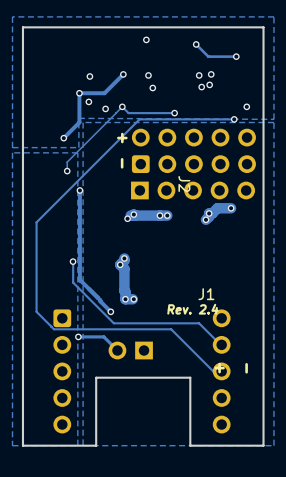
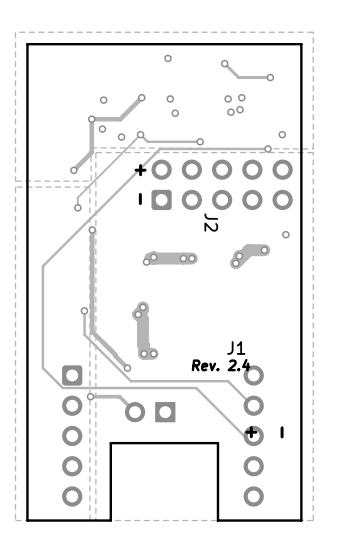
part: (193, 190) -> none
via: none -> (285, 234)

